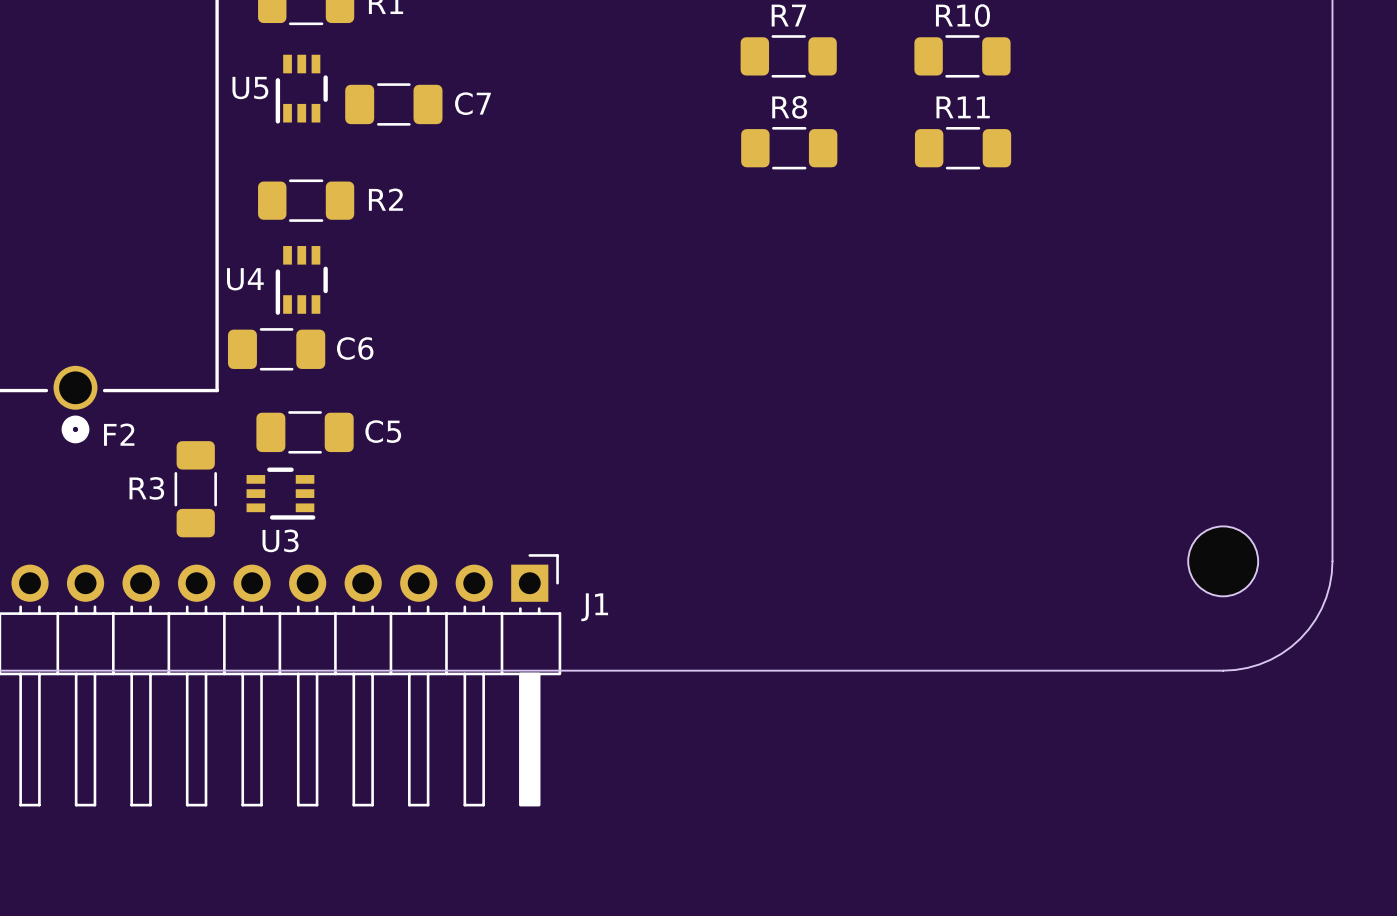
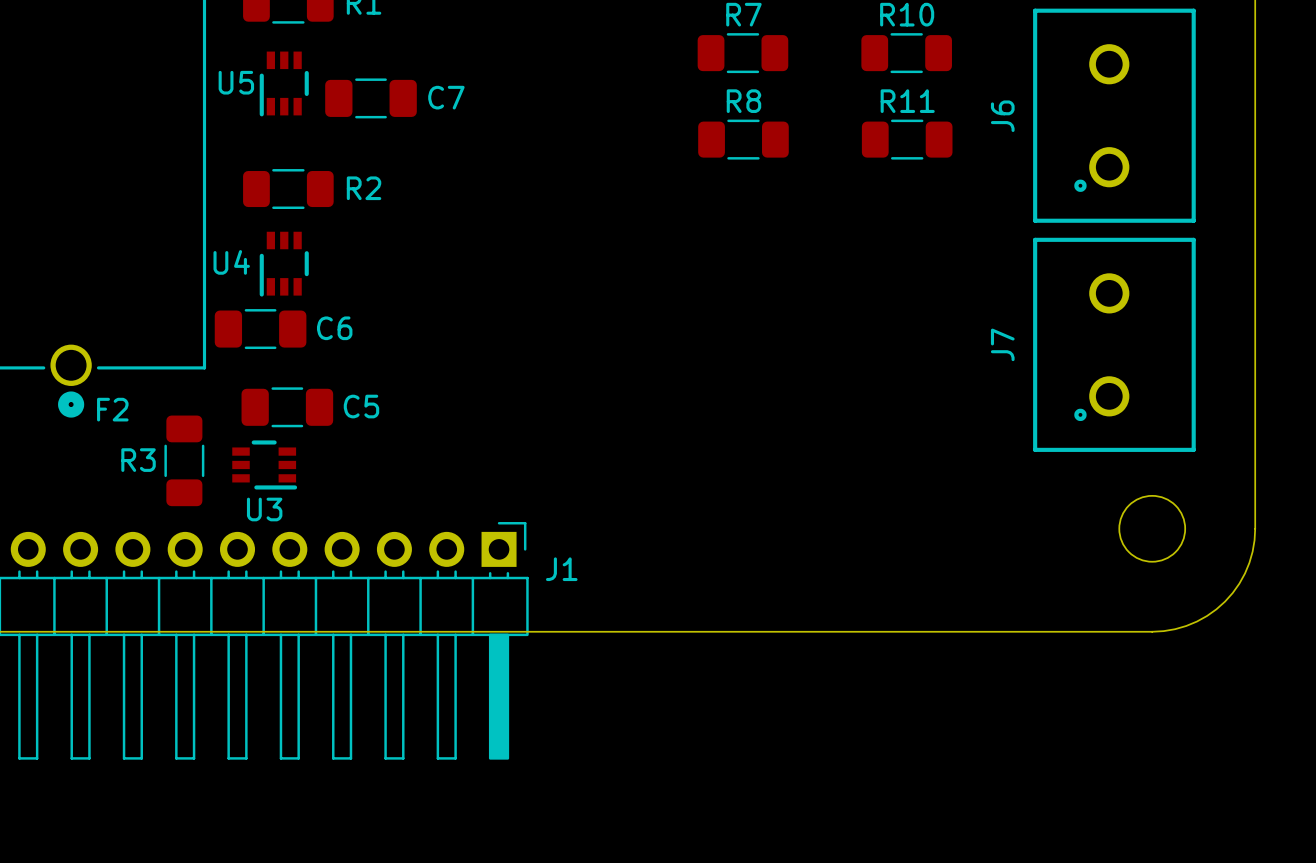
J6: none -> (1114, 115)
J7: none -> (1114, 344)

